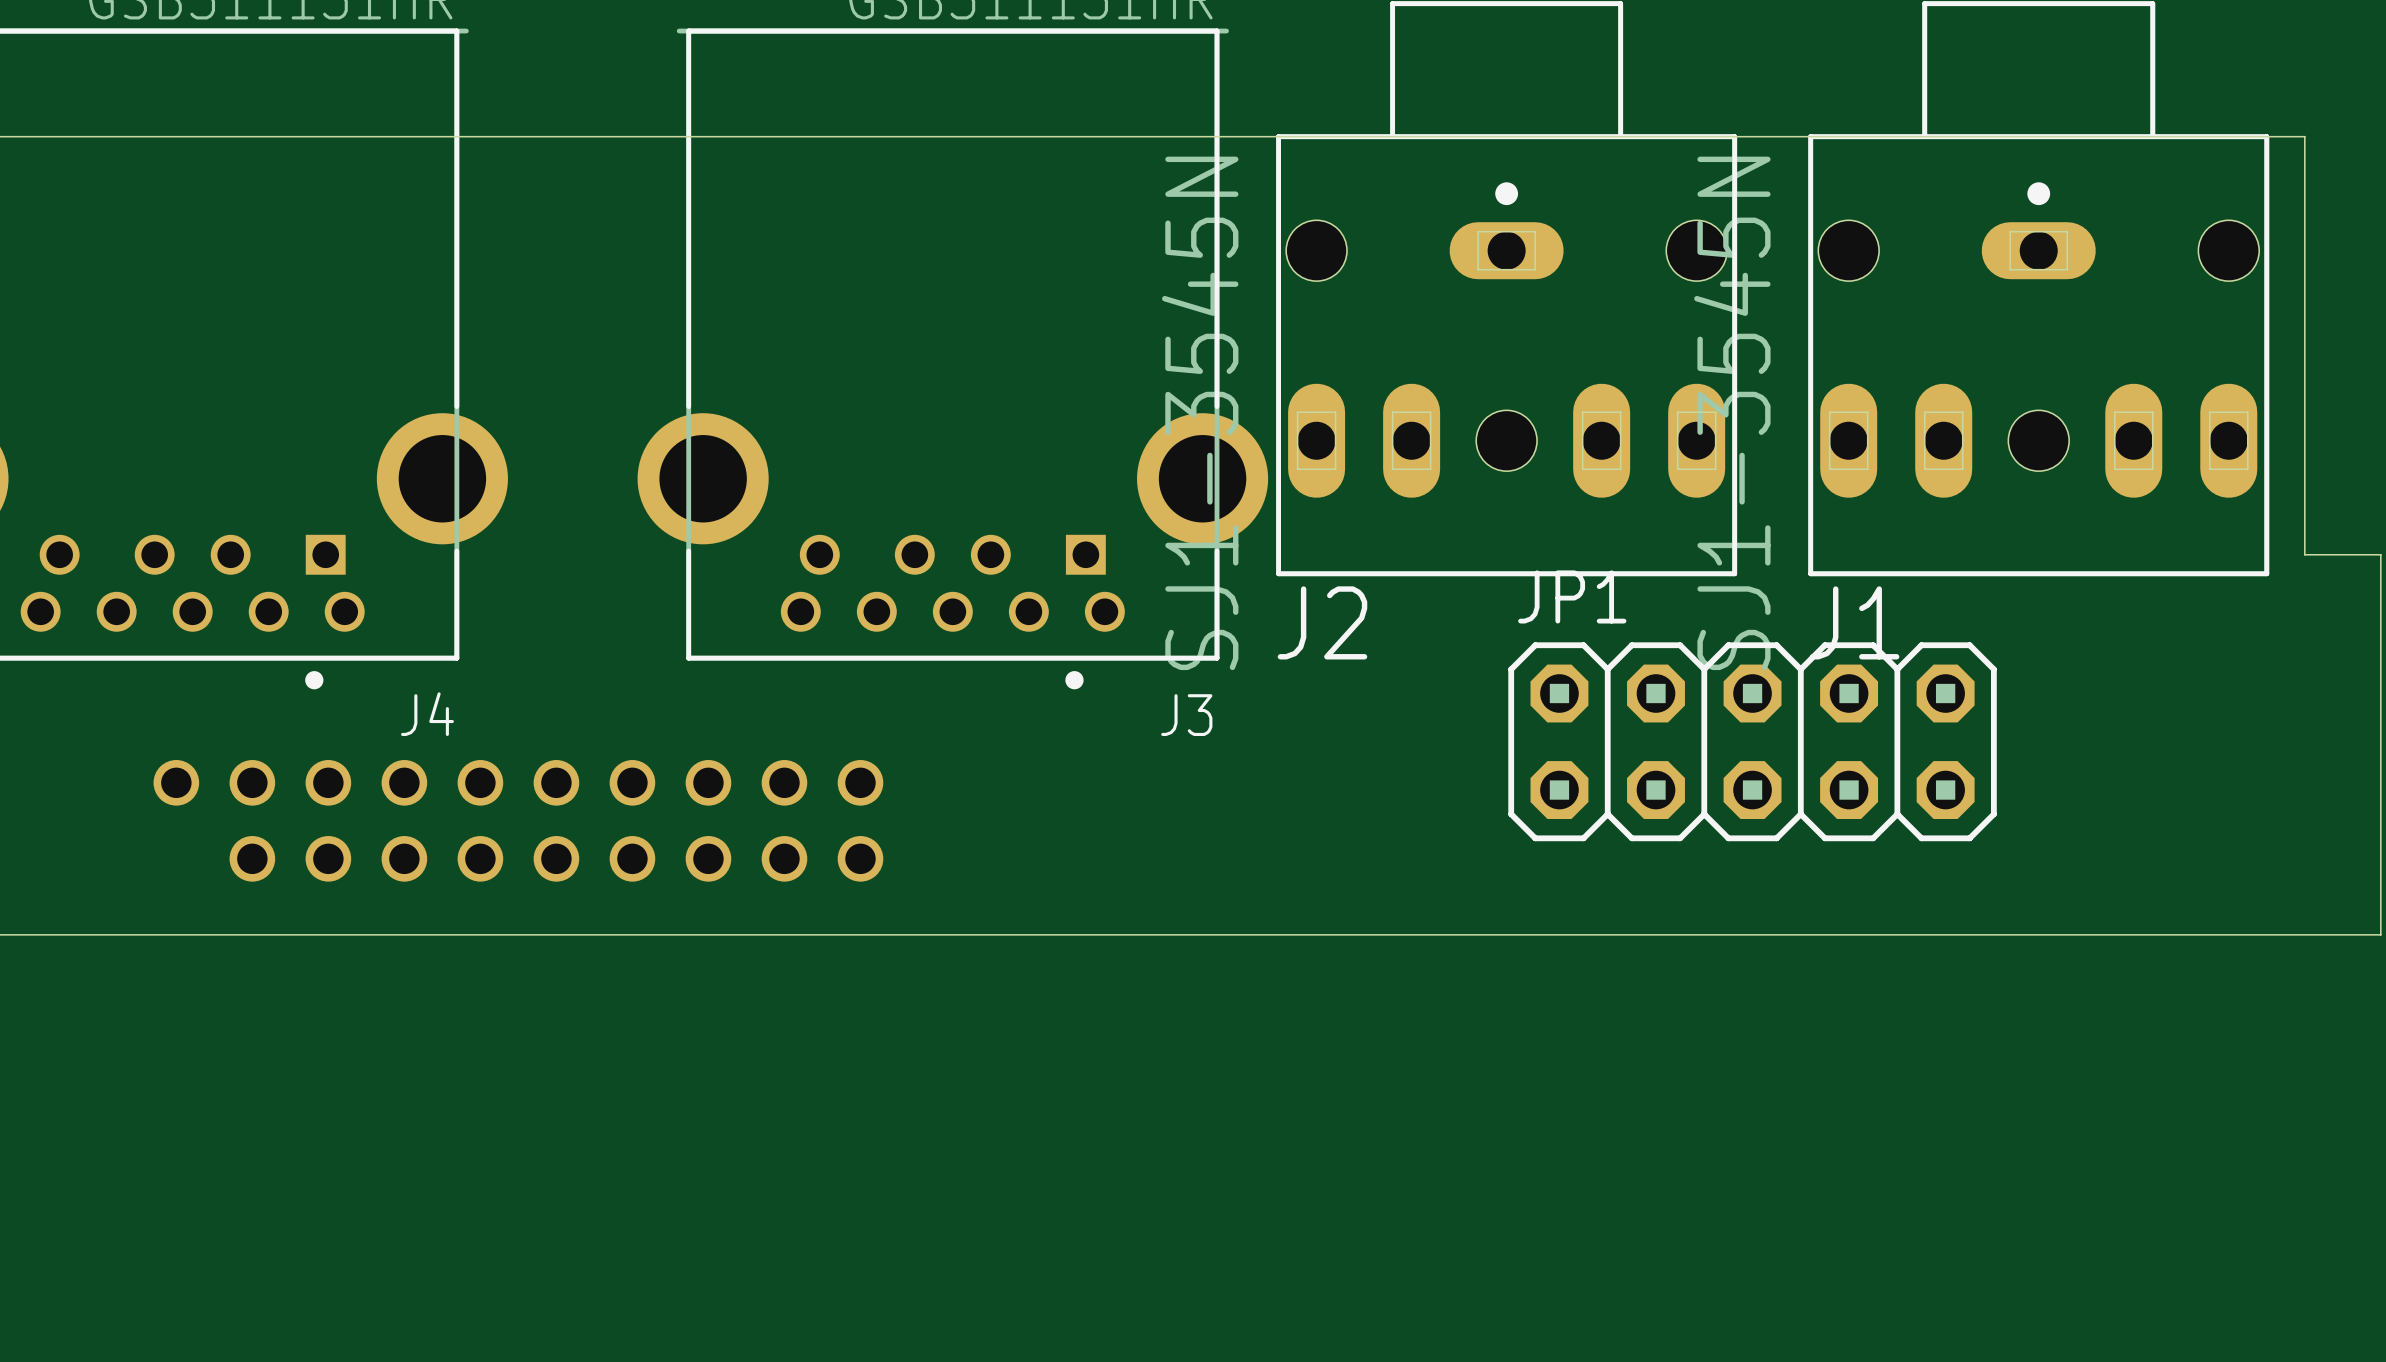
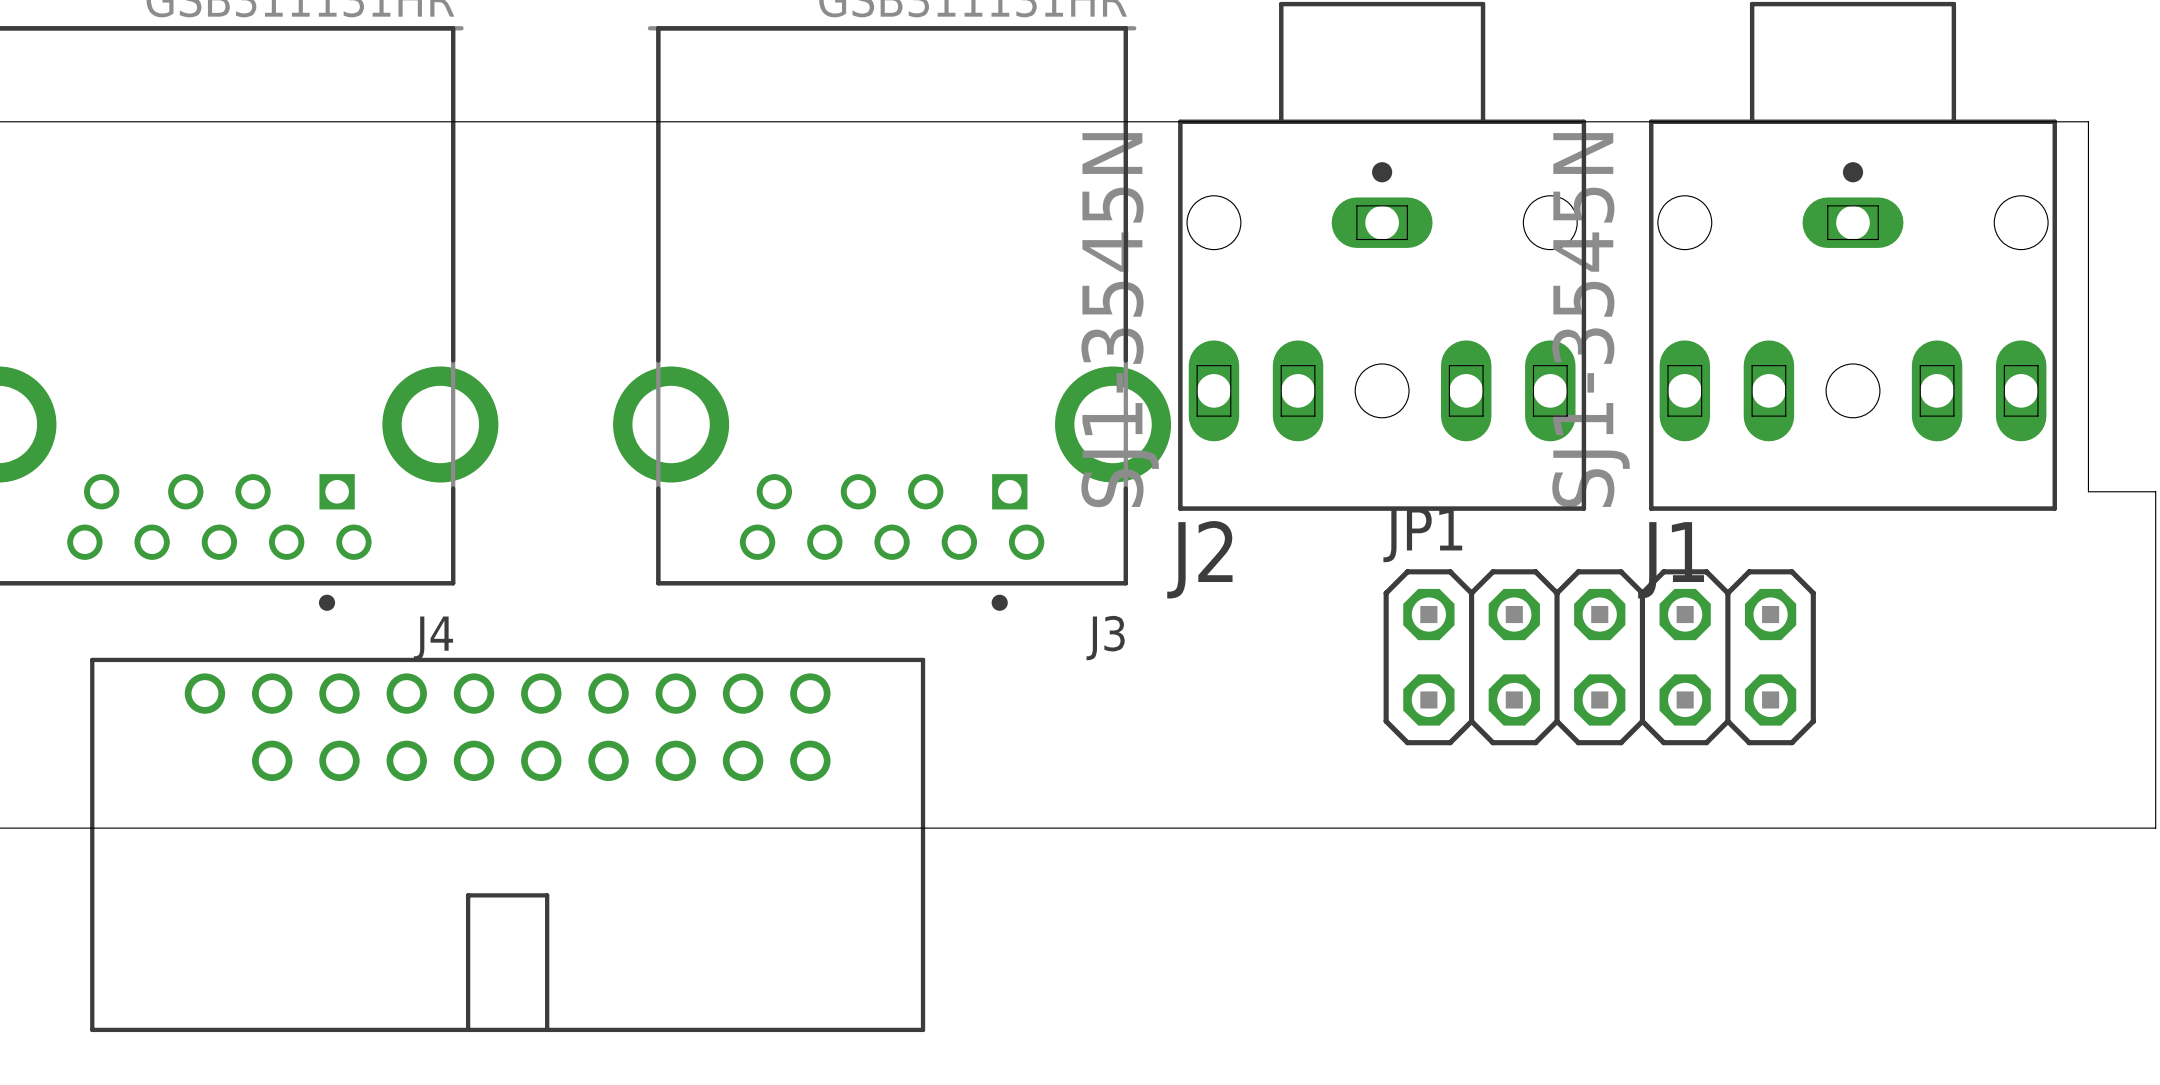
part: none -> (507, 844)

